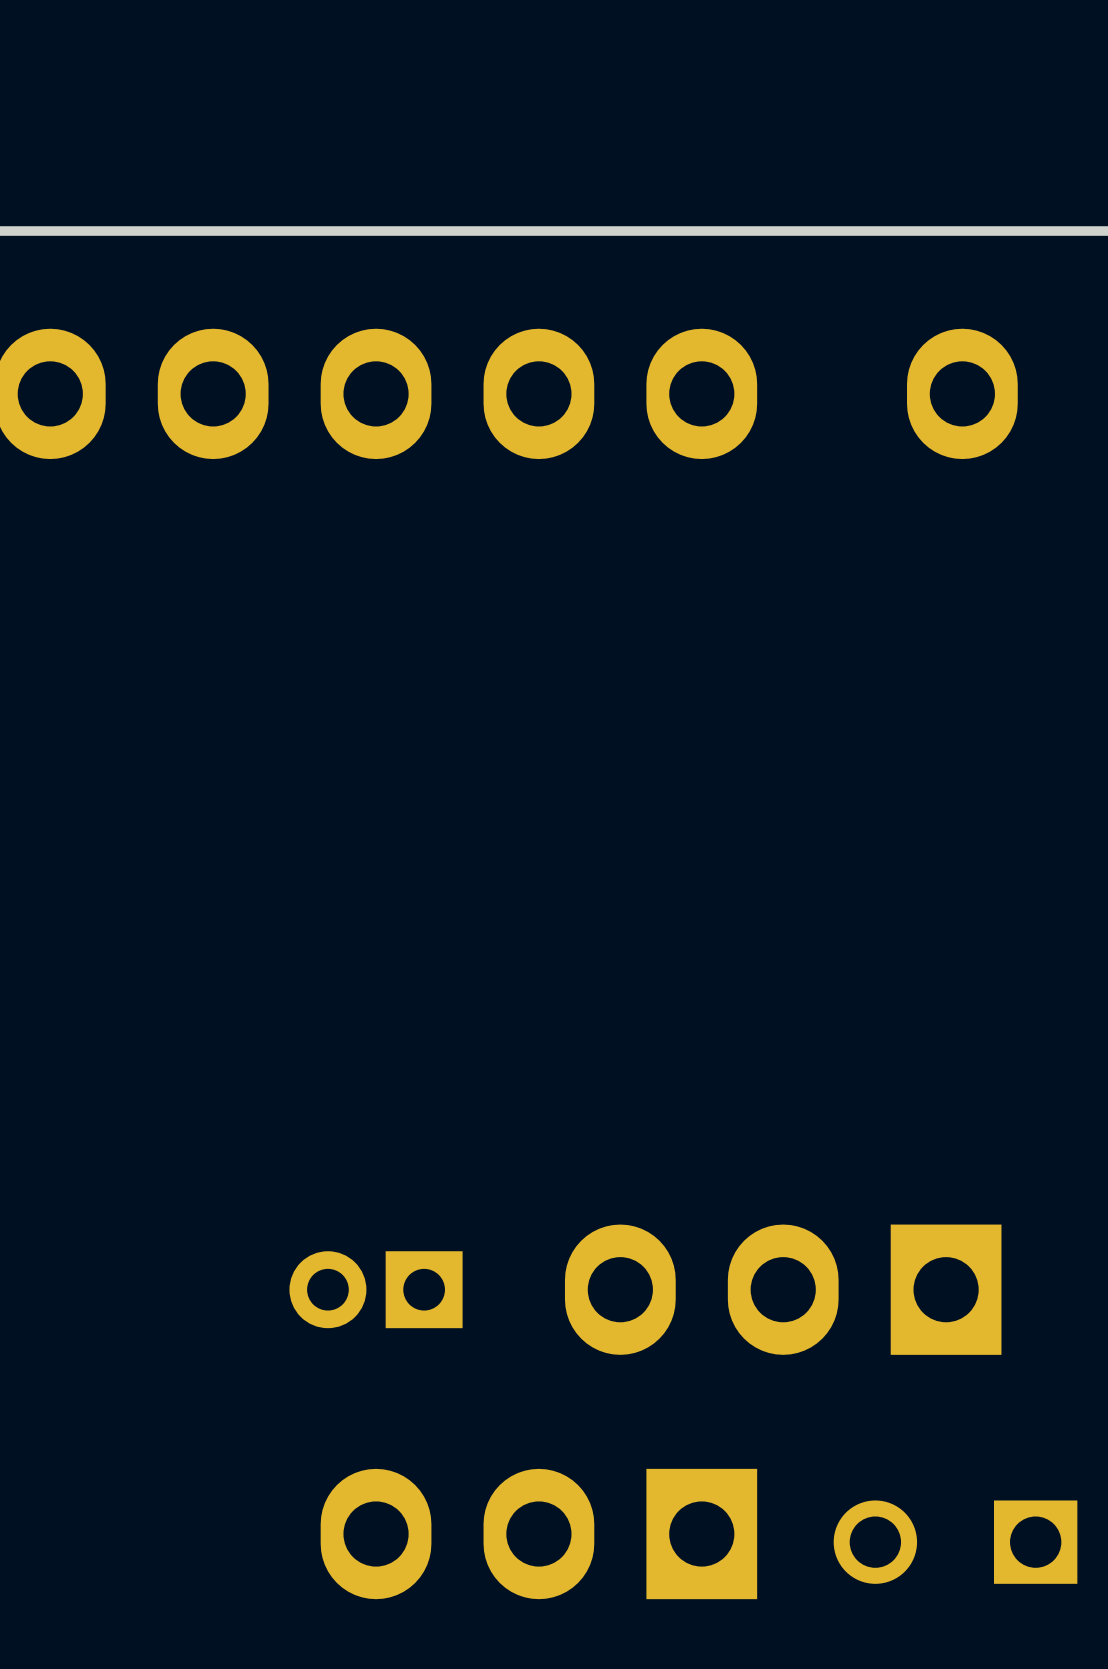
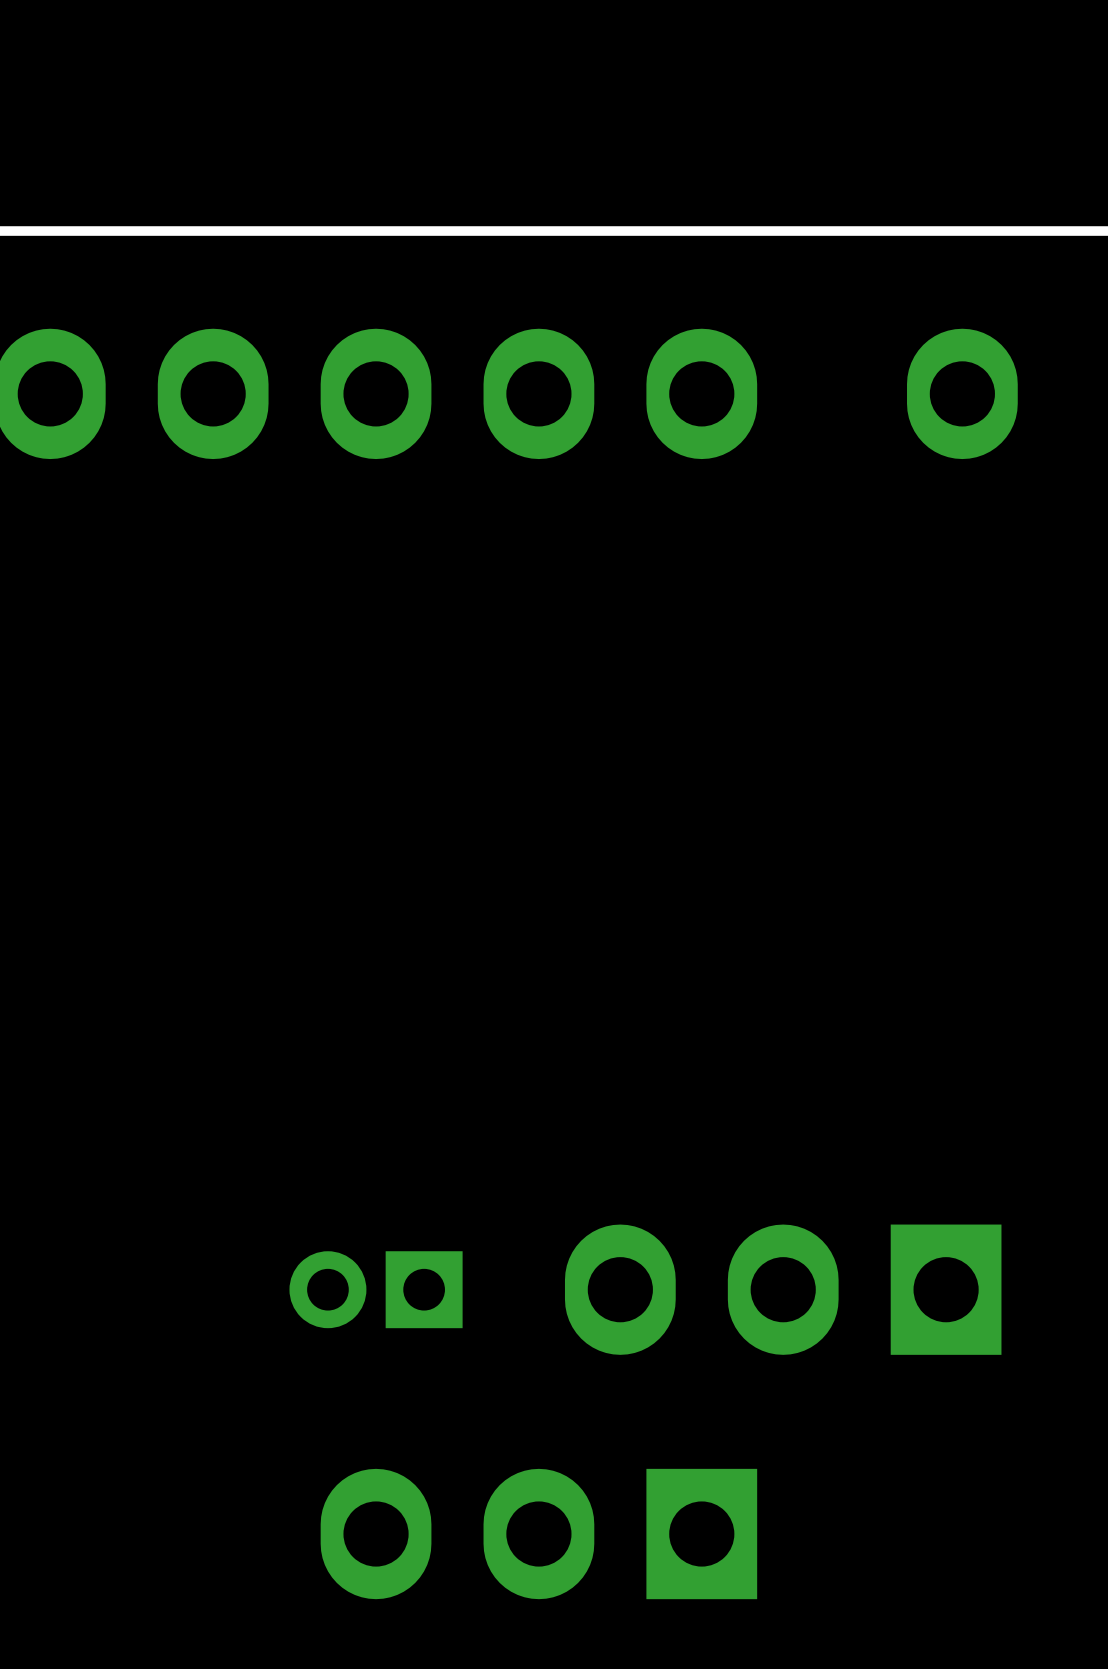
part: (955, 1542) -> none

